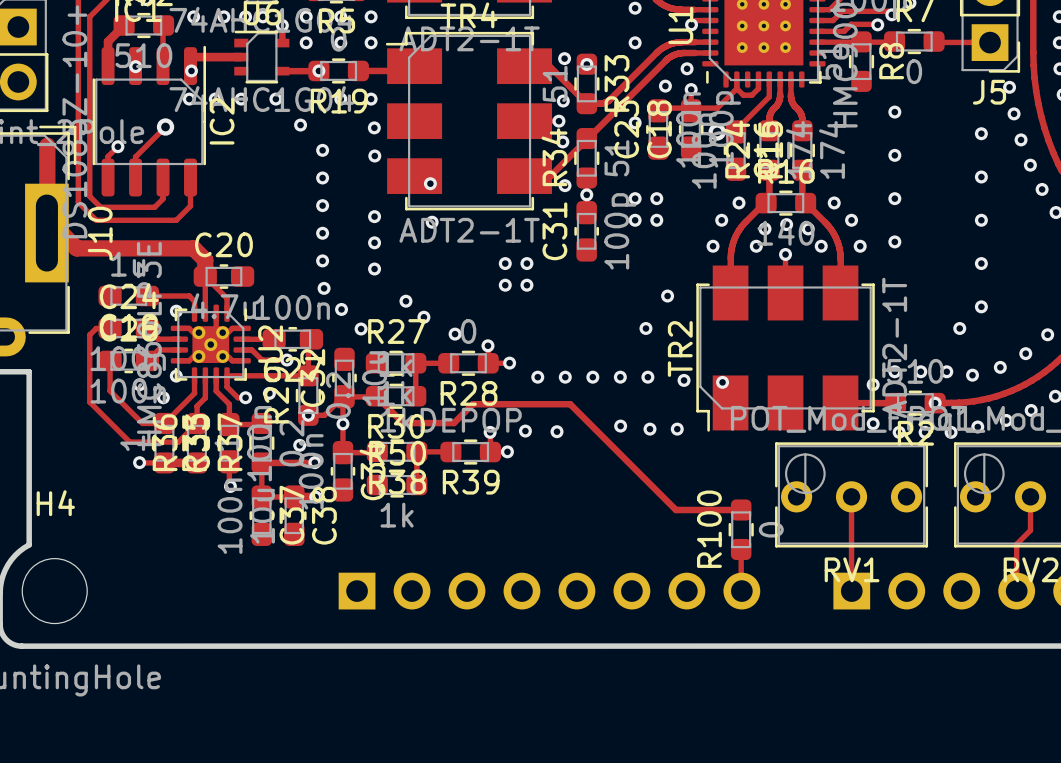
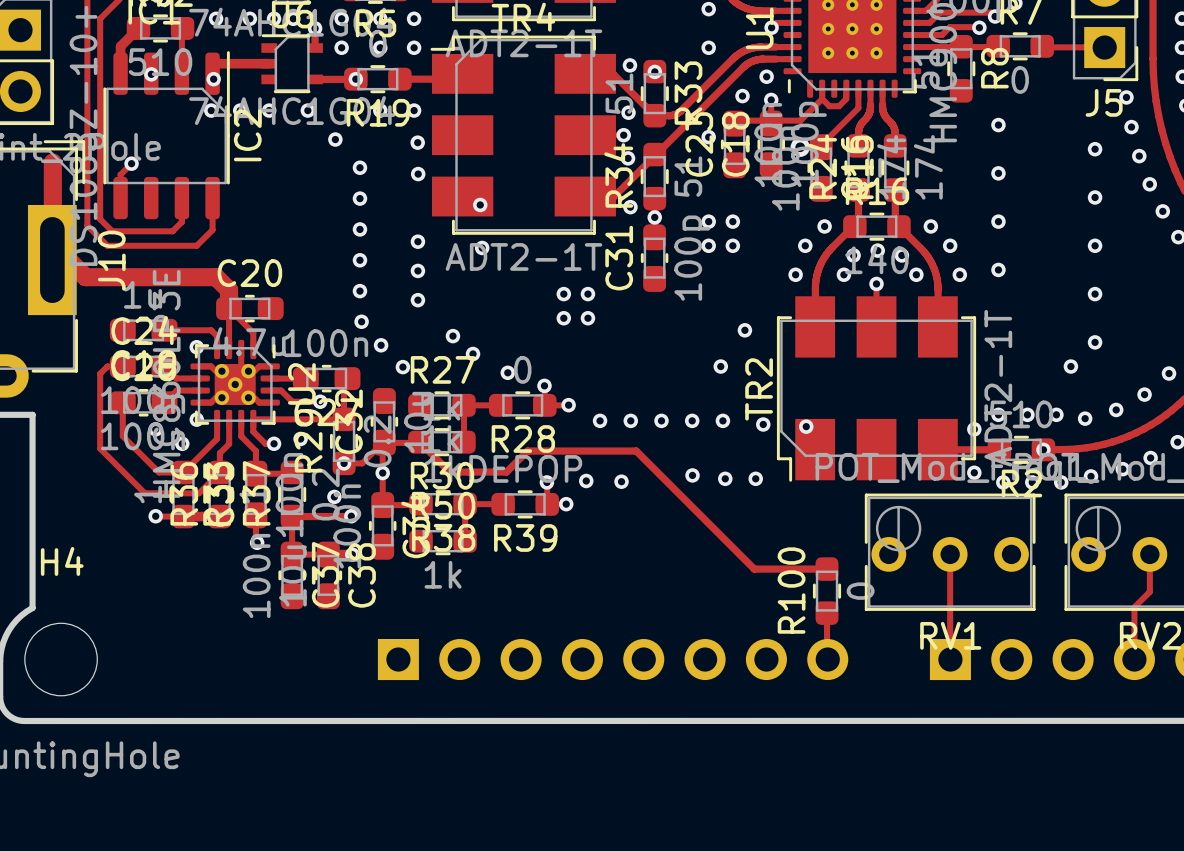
track: (165, 127) (135, 156) (135, 177) -> none
via: (165, 127) -> none

